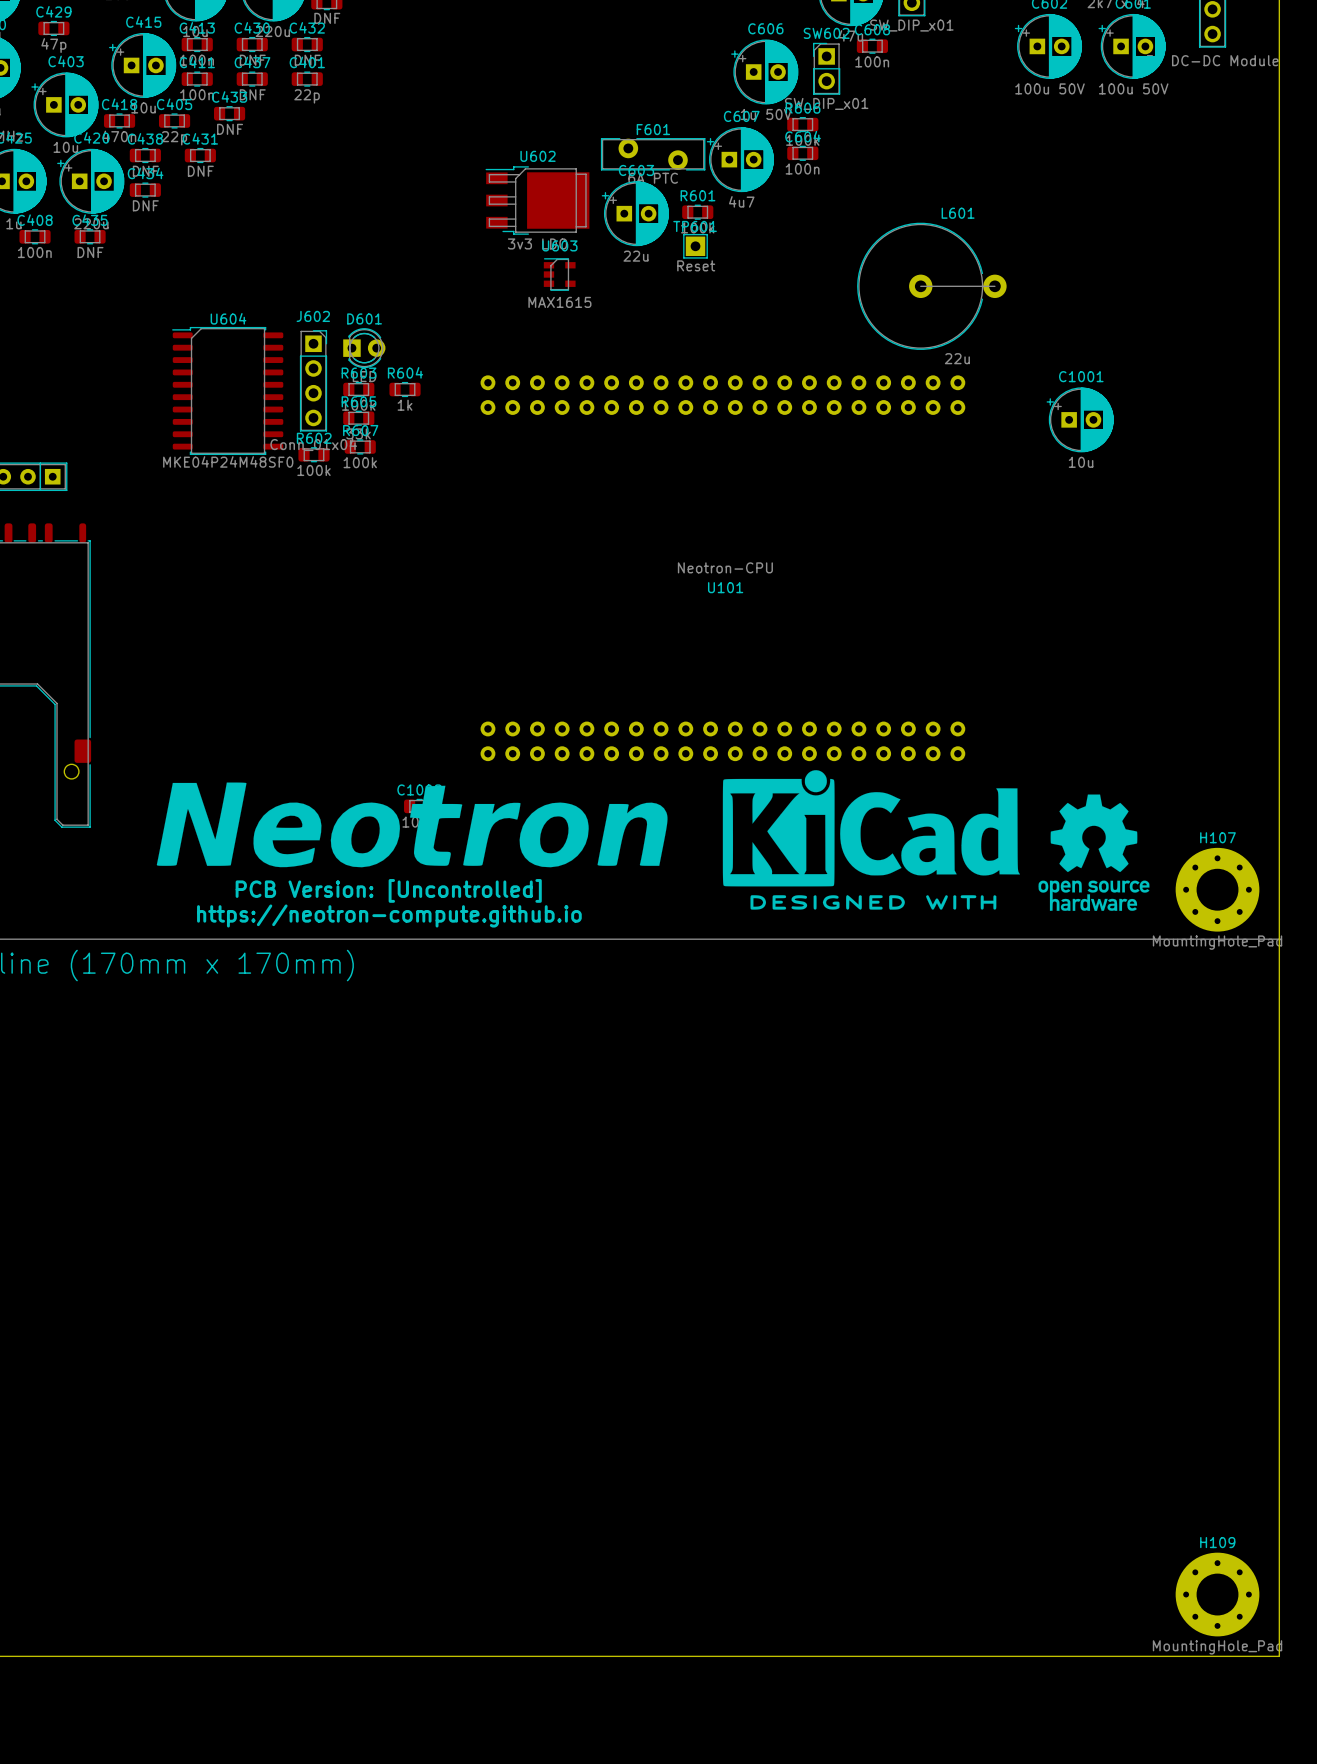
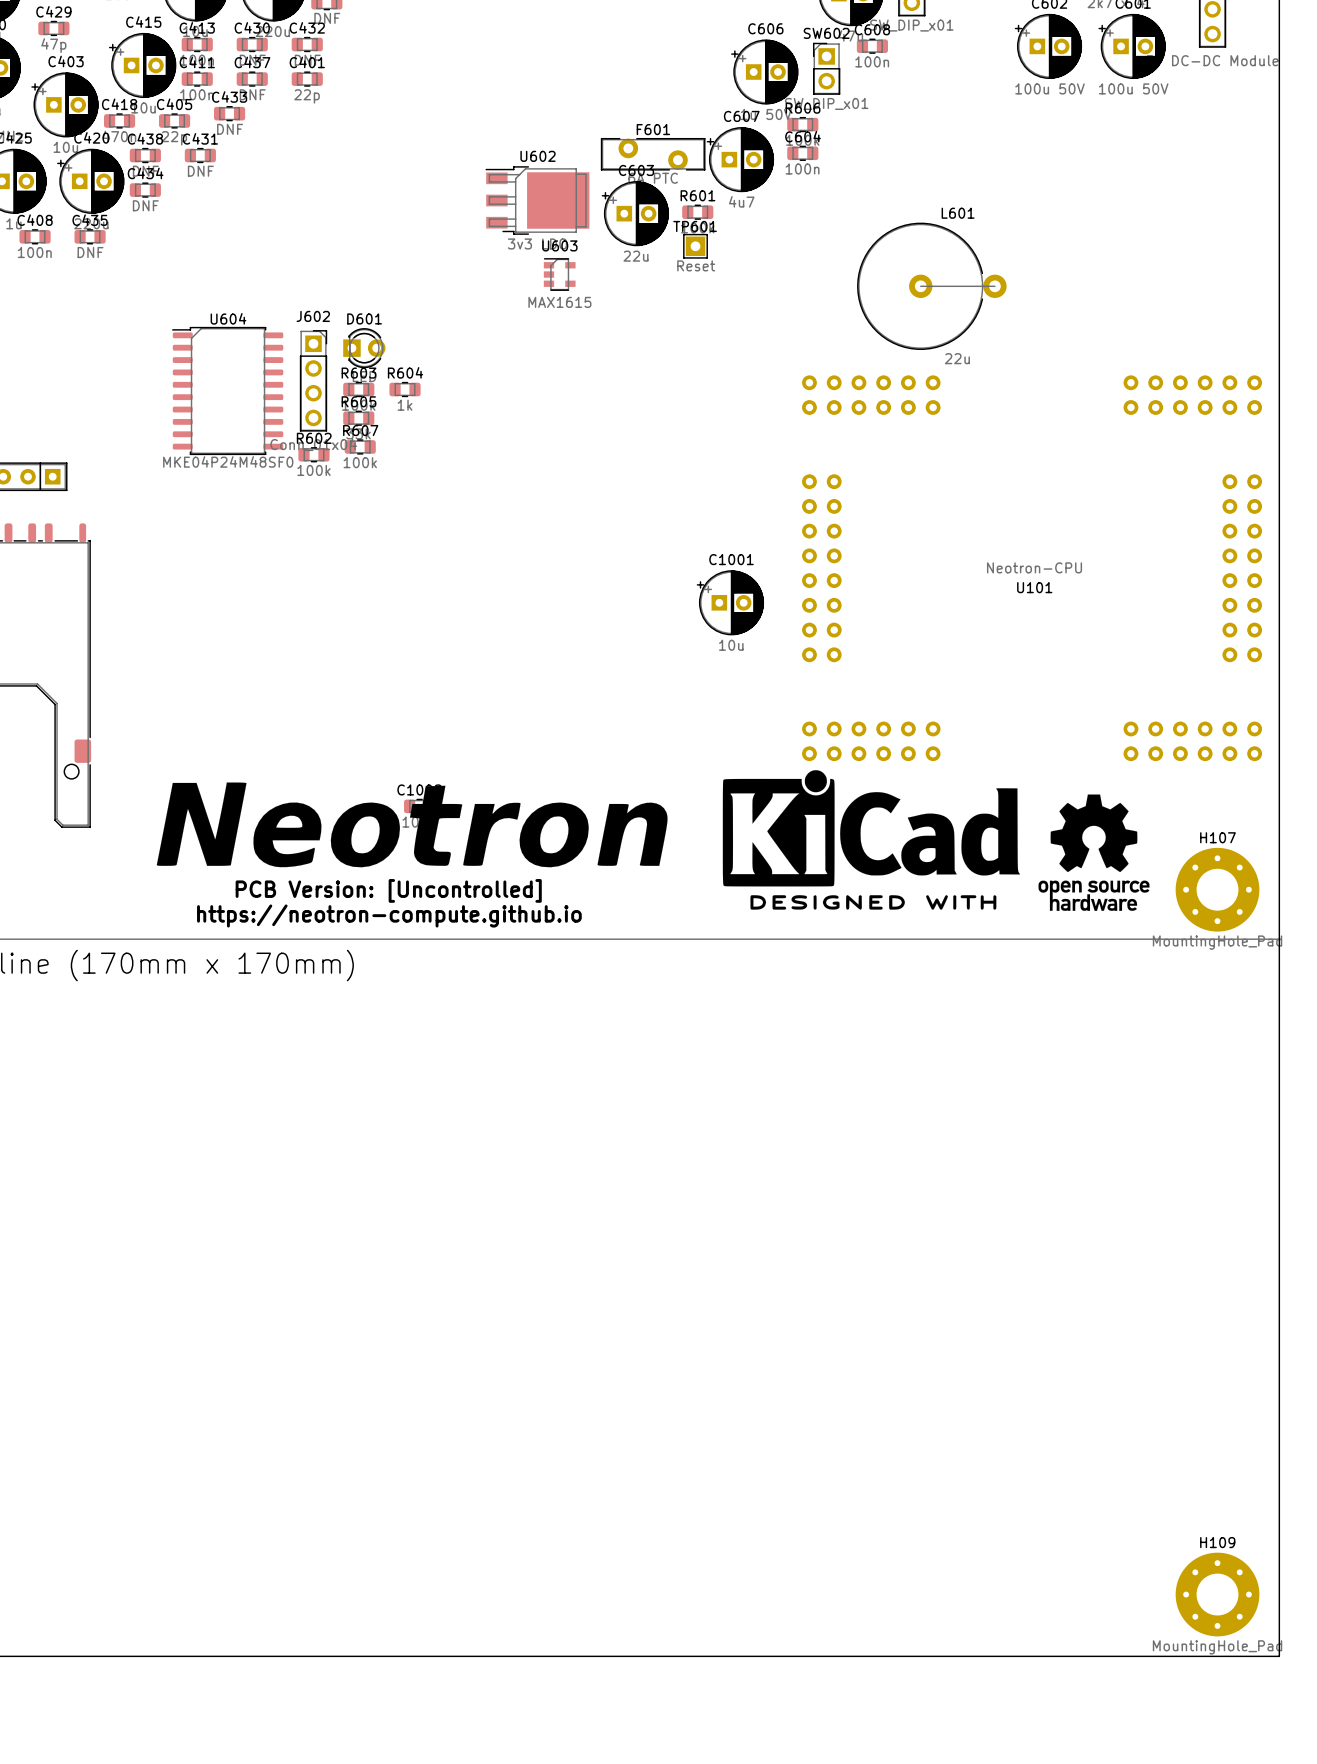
U101 footprint: [480, 375, 966, 762] -> [802, 375, 1263, 762]
C1001 position: (1080, 419) -> (730, 602)

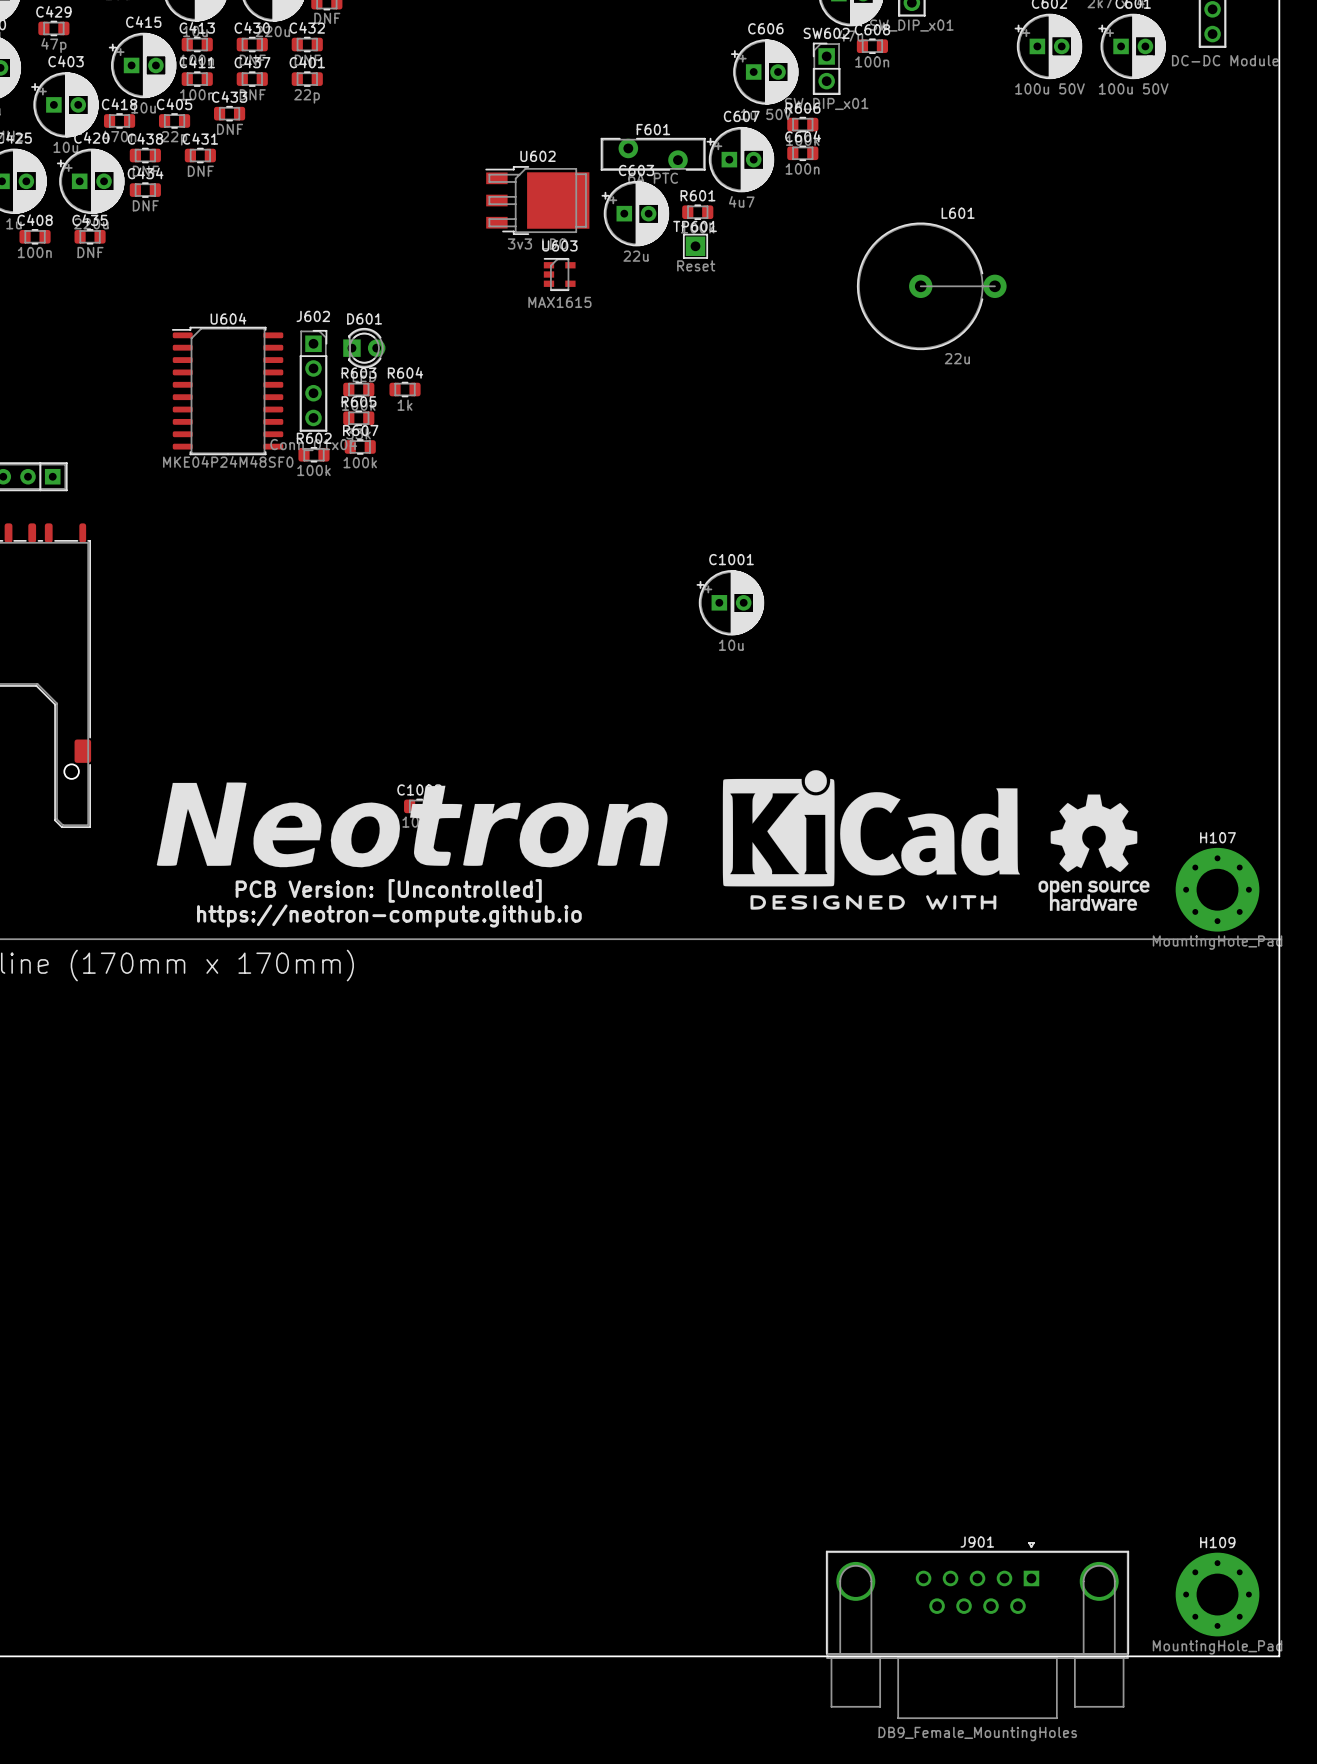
U101: Neotron-CPU (1032, 568) -> none
J901: none -> DB9_Female_MountingHoles (977, 1630)

